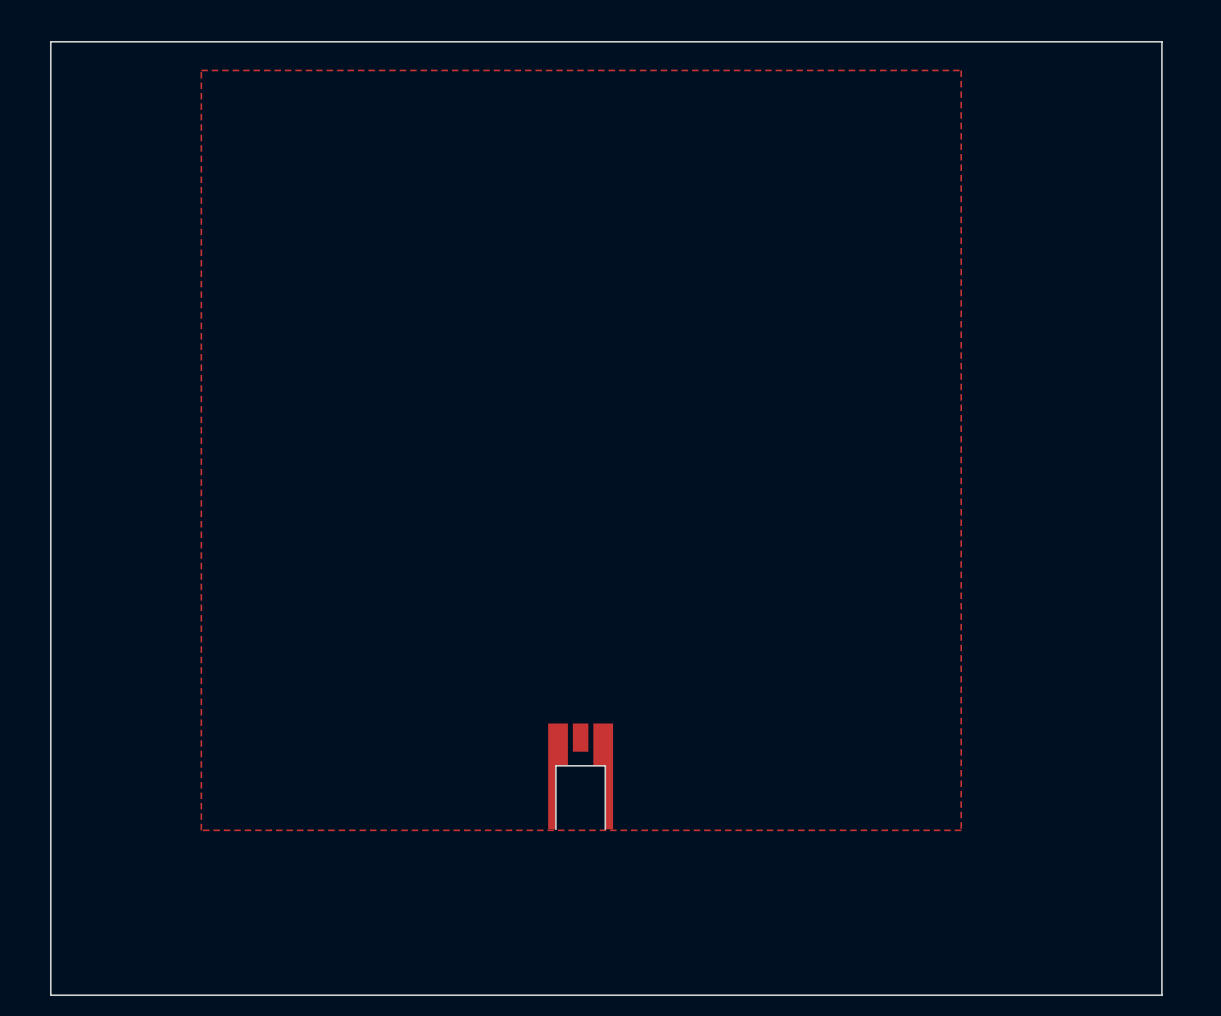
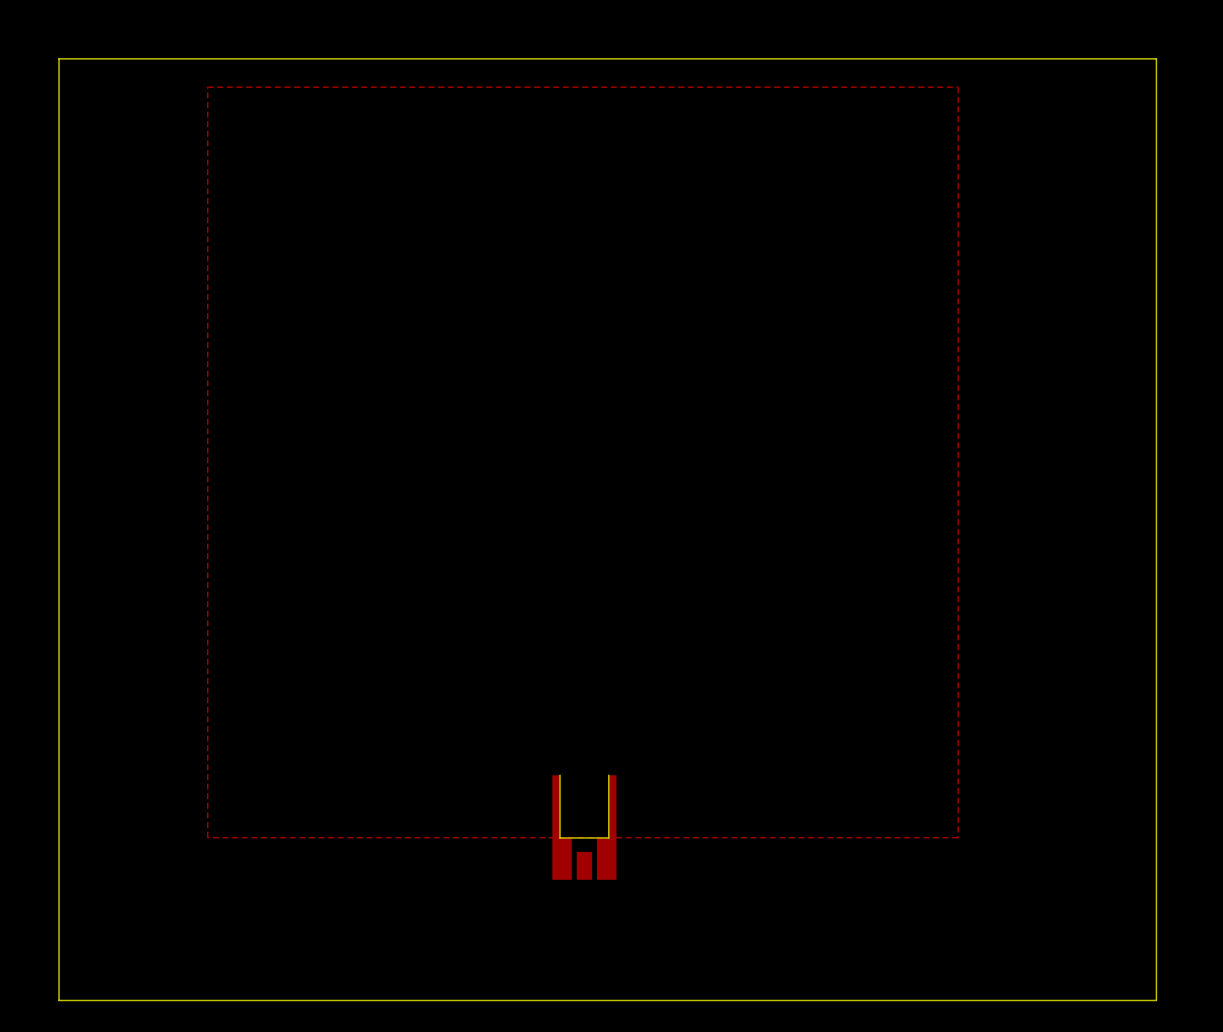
part rotation: 0° (580, 776) -> 180° (584, 827)

